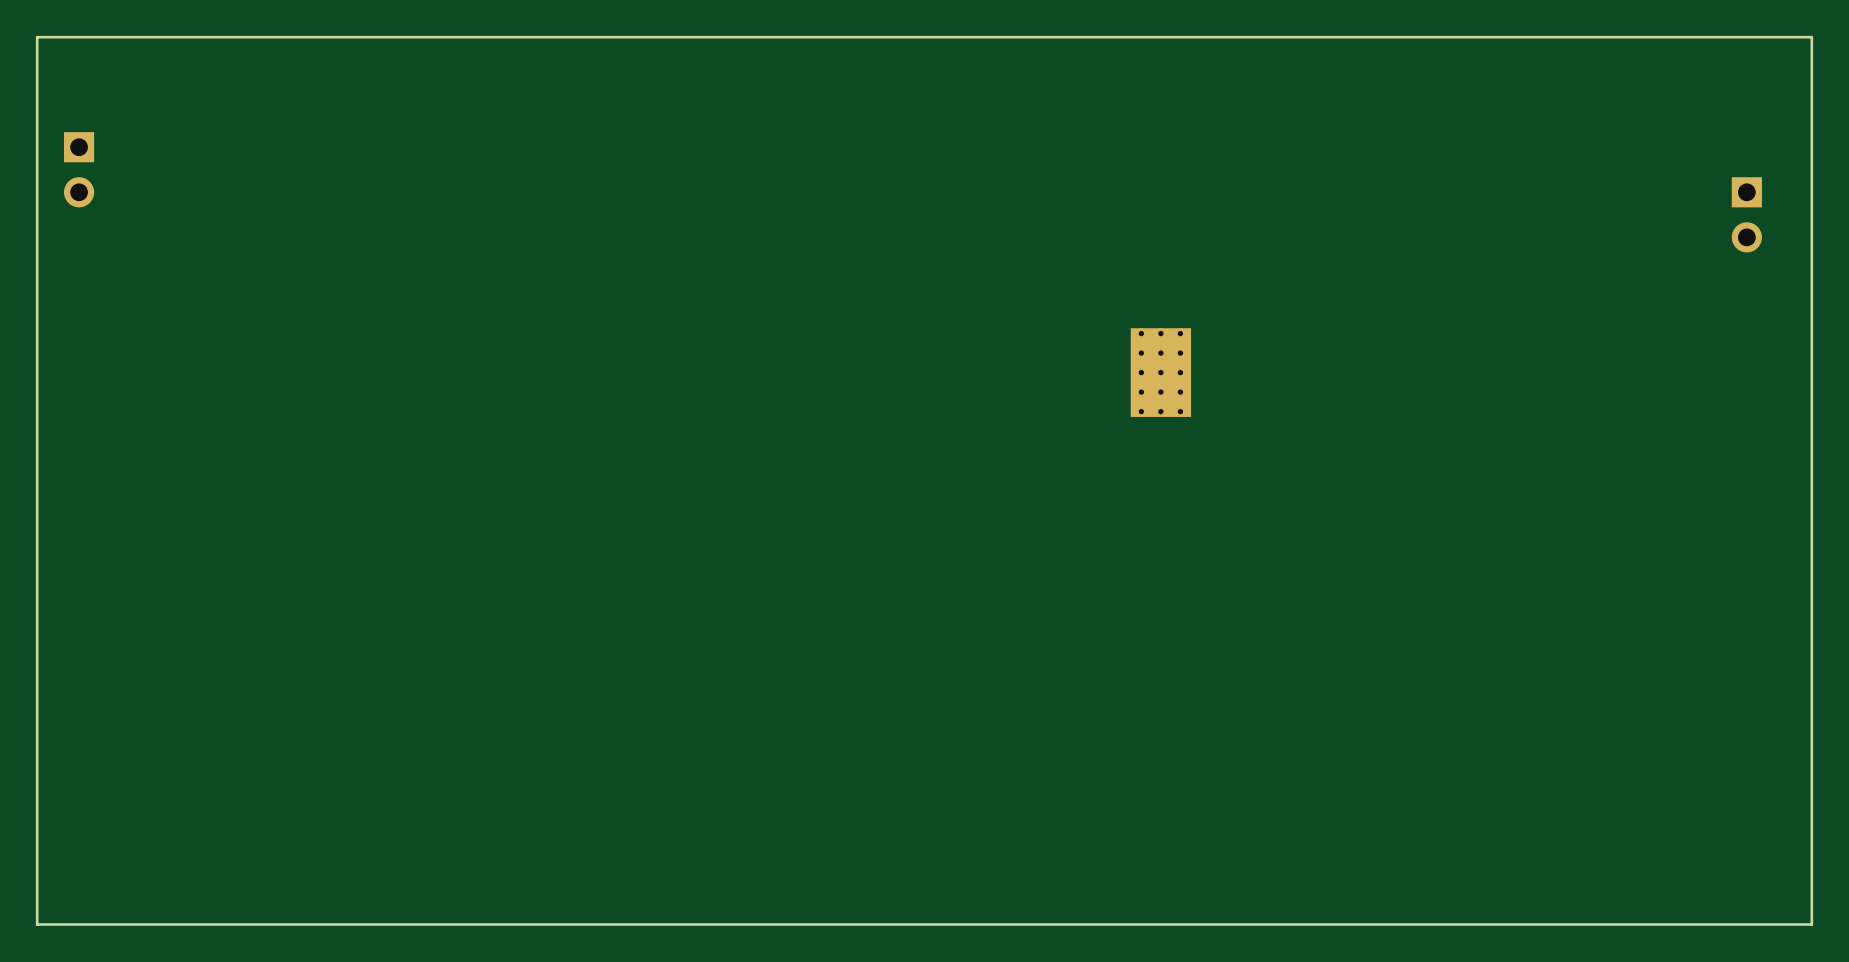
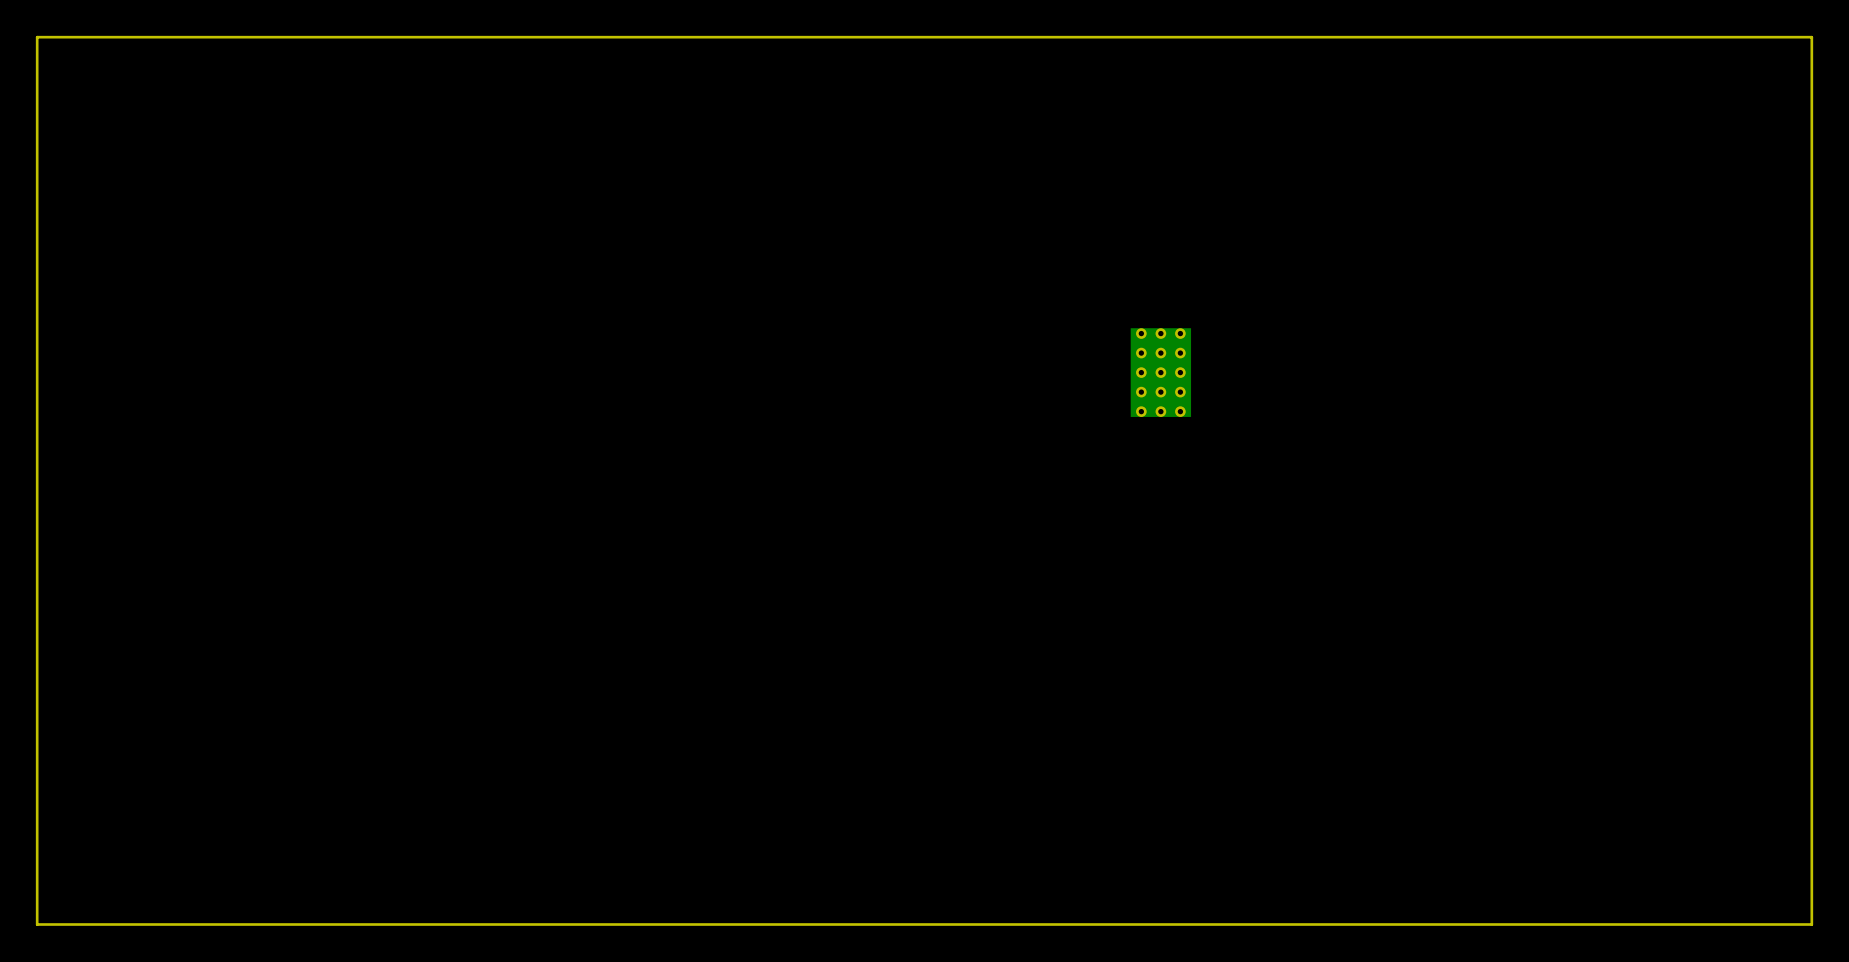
part: (79, 169) -> none
part: (1746, 214) -> none

